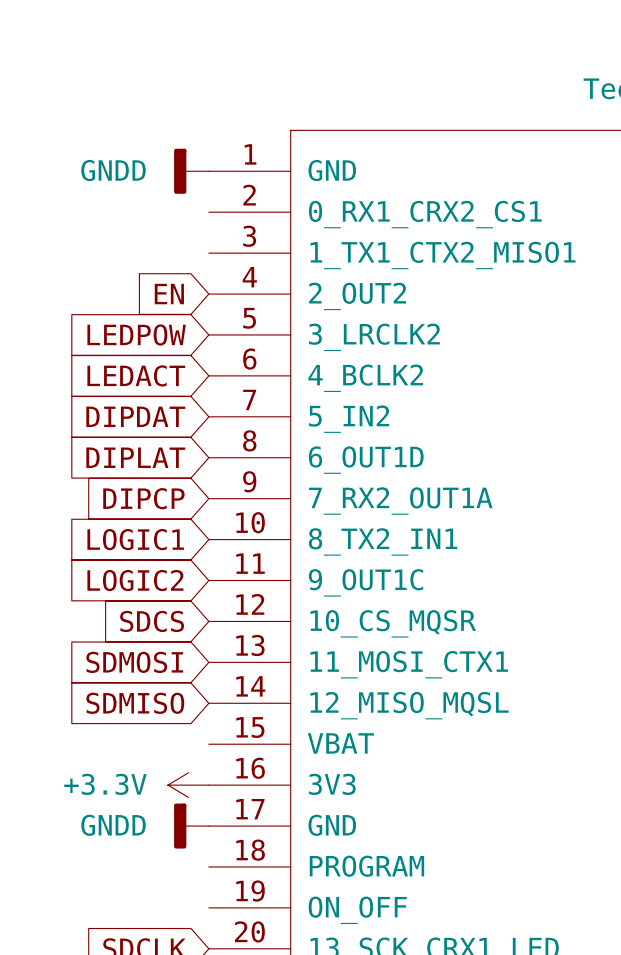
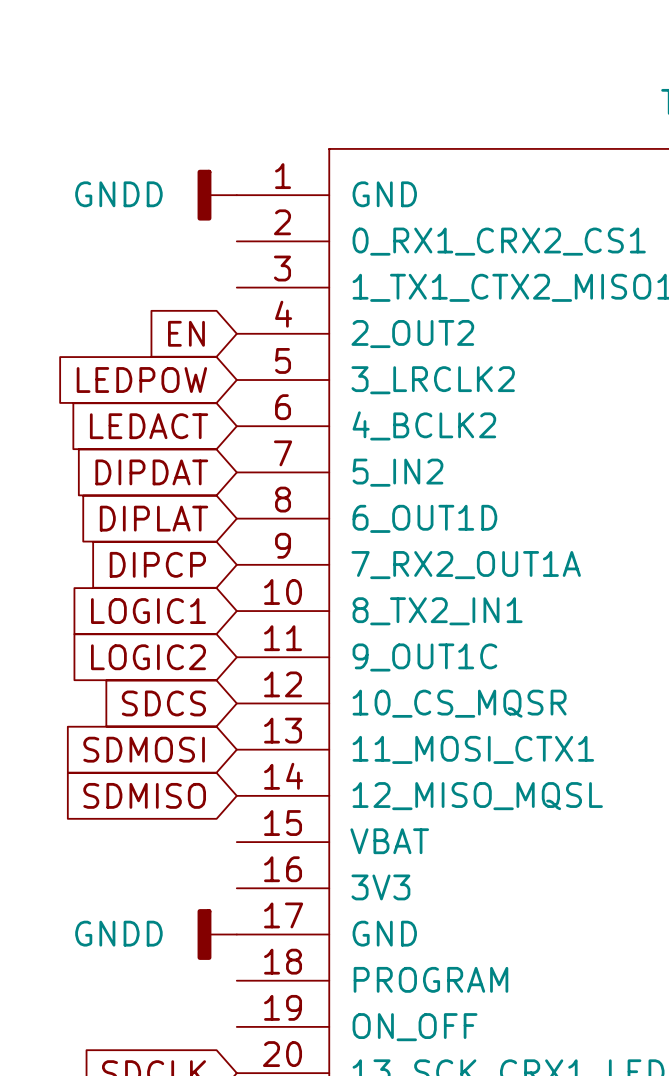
power symbol: +3.3V (188, 785) -> none

